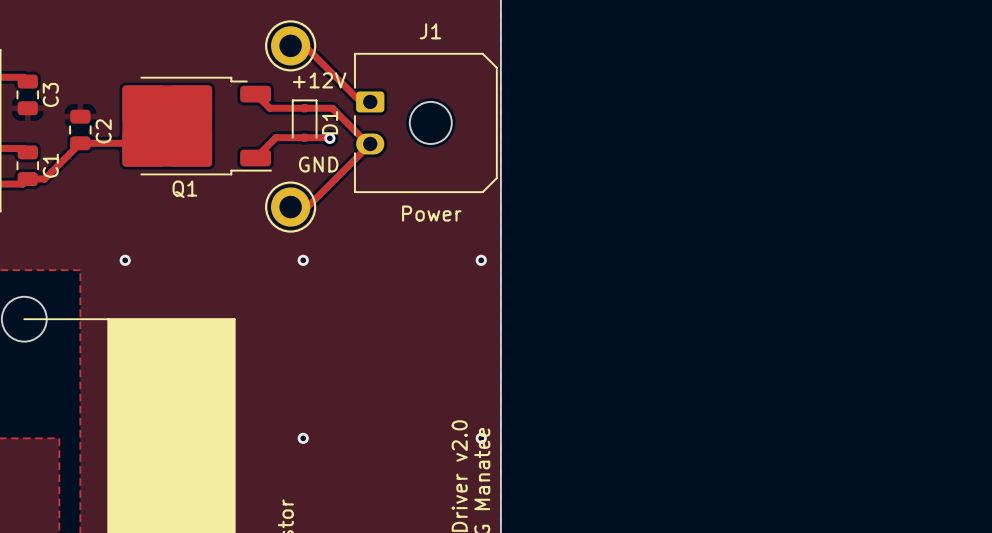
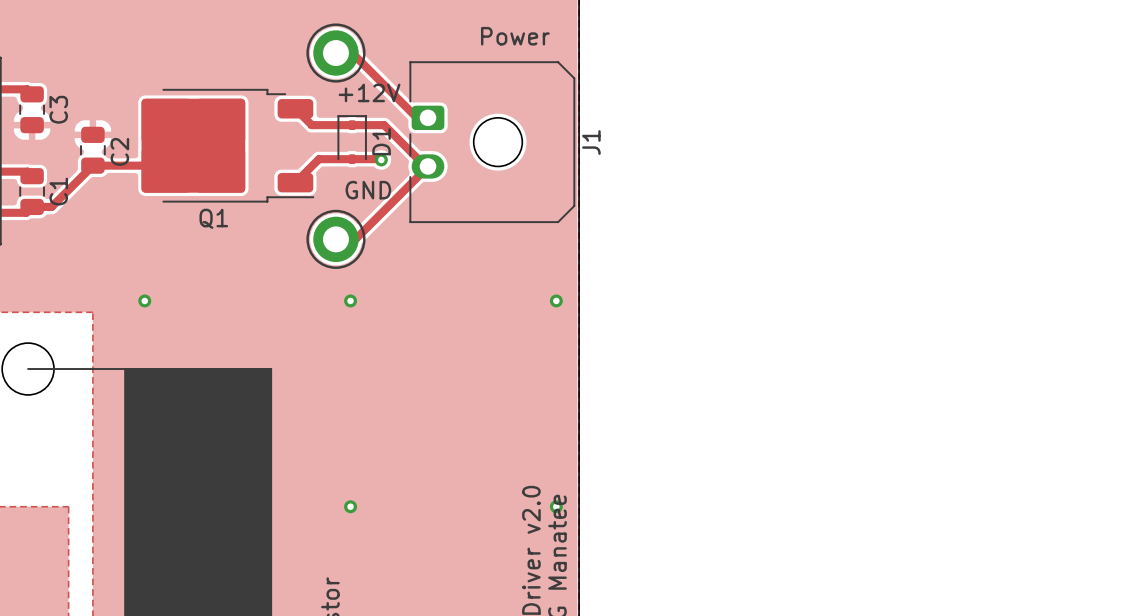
J1 name rotation: 0° (430, 31) -> 90° counterclockwise (591, 142)
J1 name position: J1 (430, 31) -> J1 (591, 142)
text position: Power (431, 213) -> Power (515, 36)

